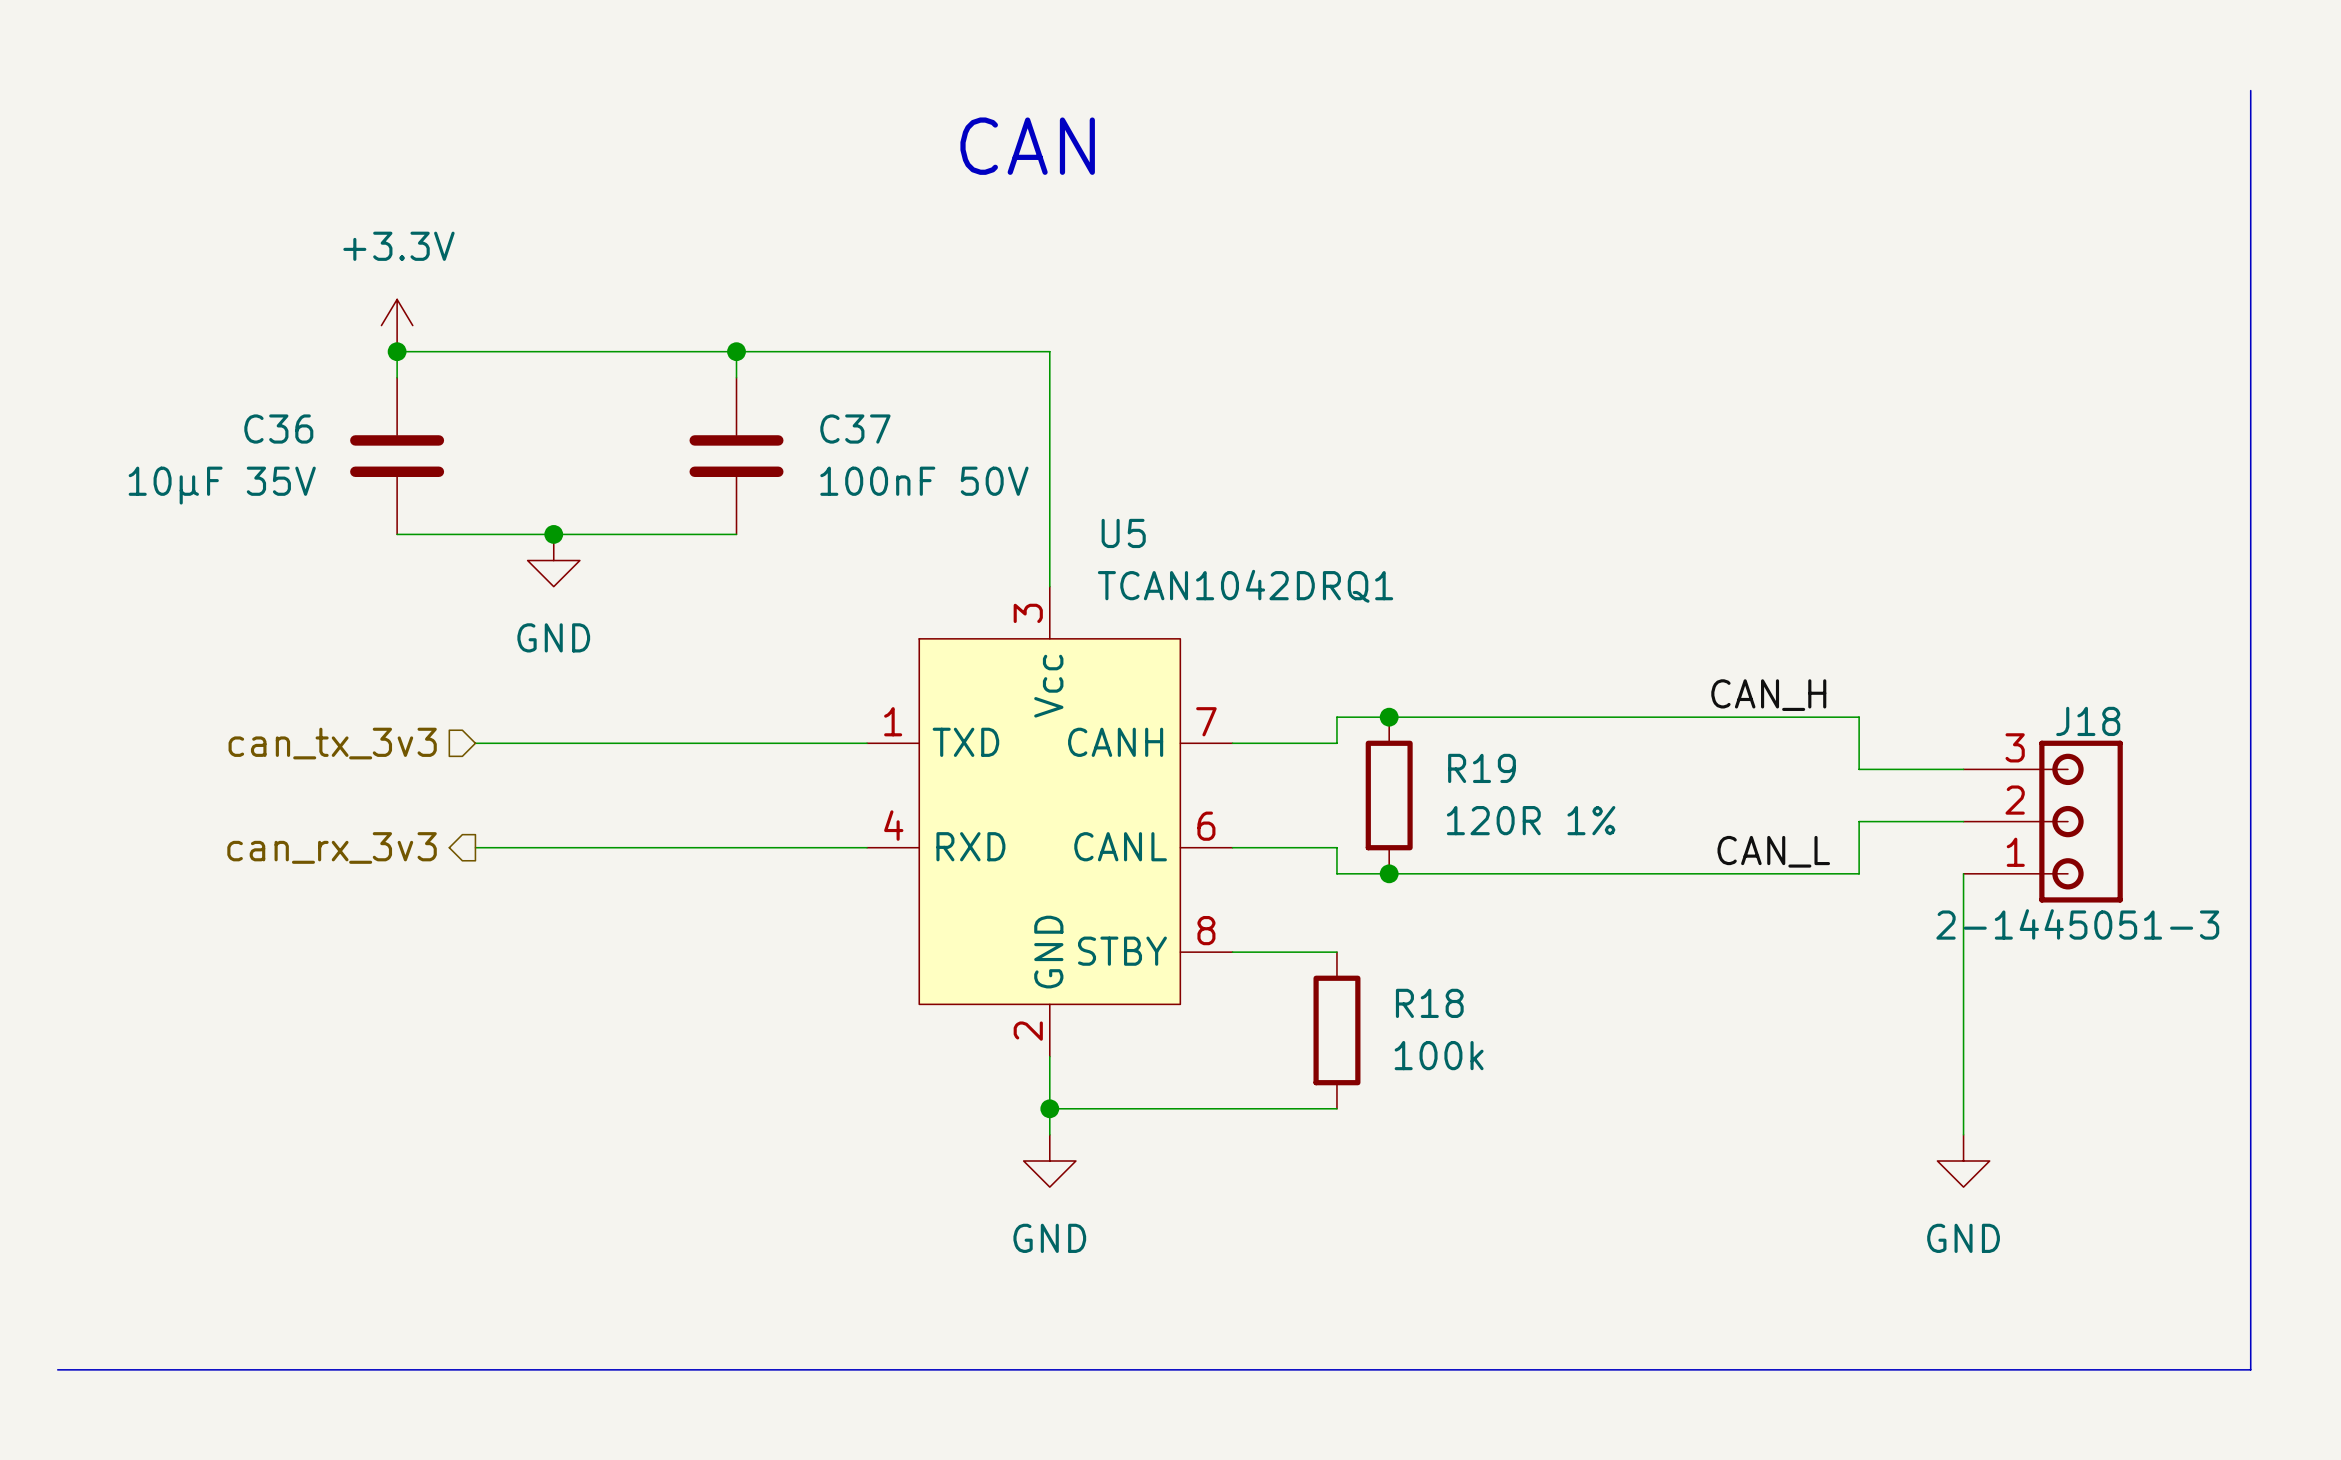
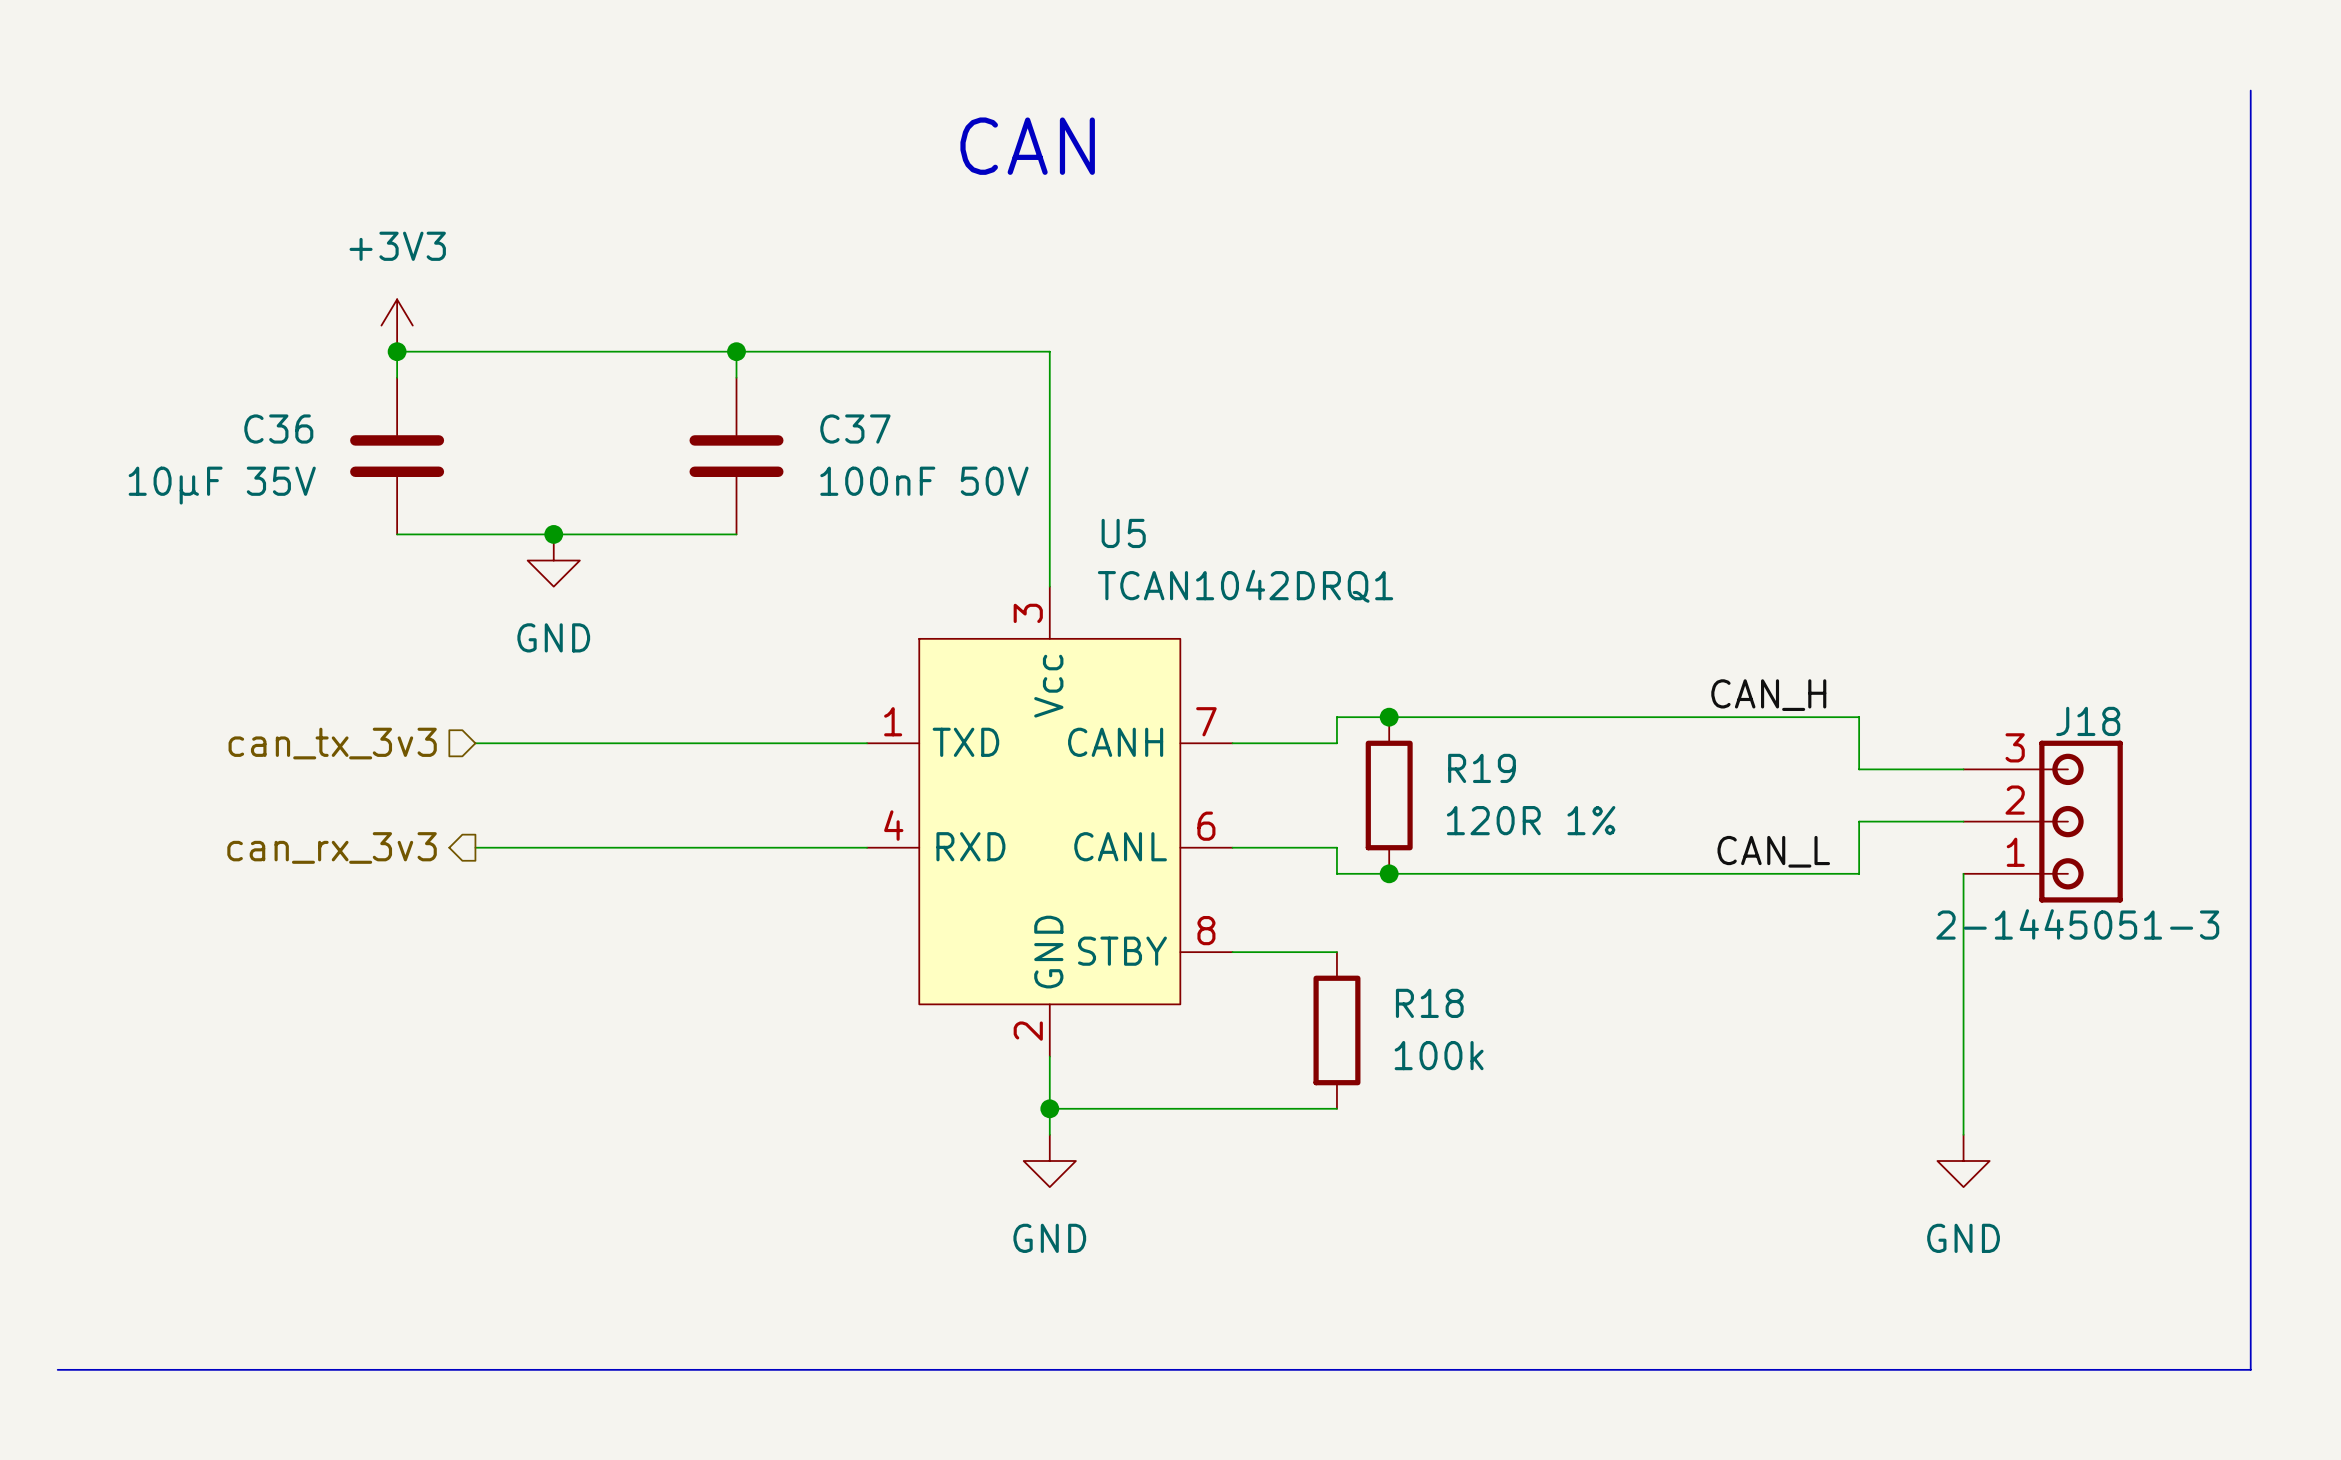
power symbol: +3.3V (397, 325) -> +3V3 (397, 325)

